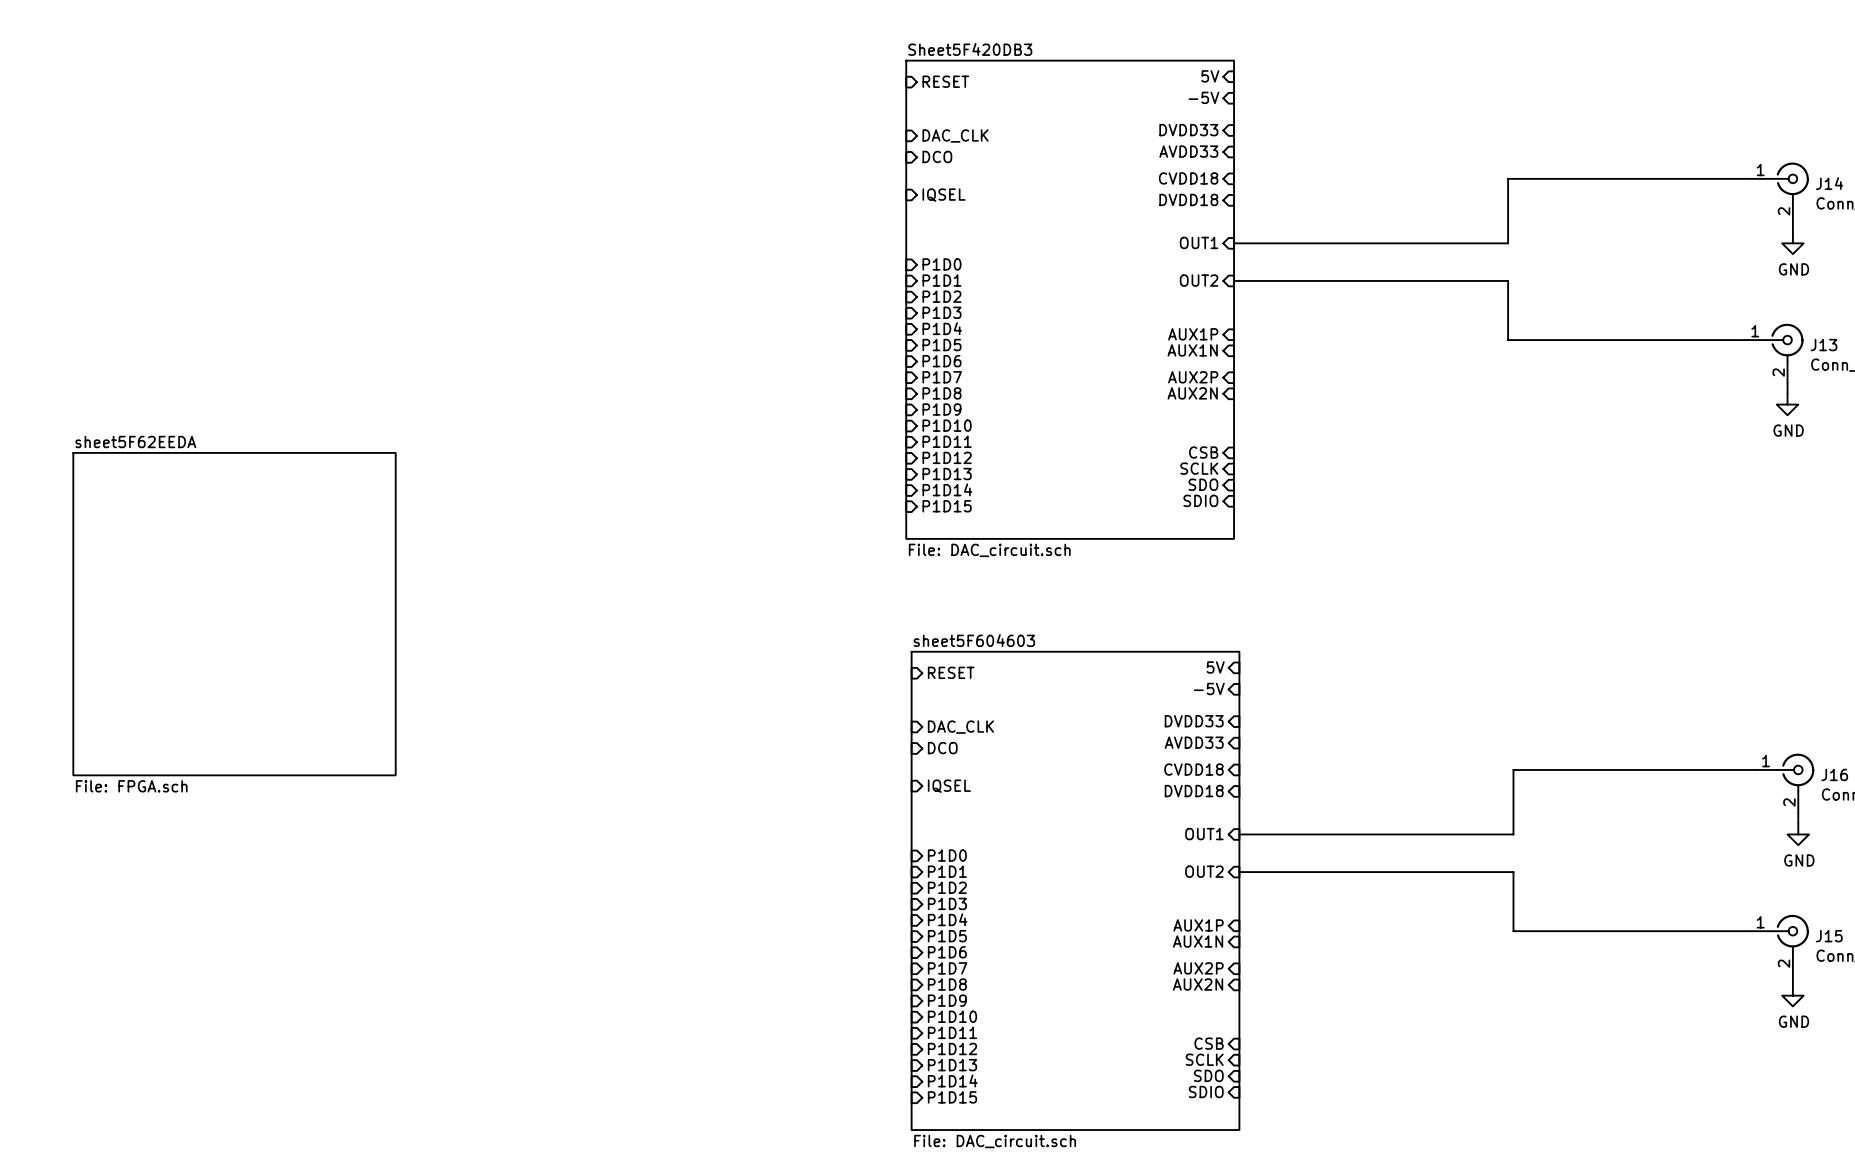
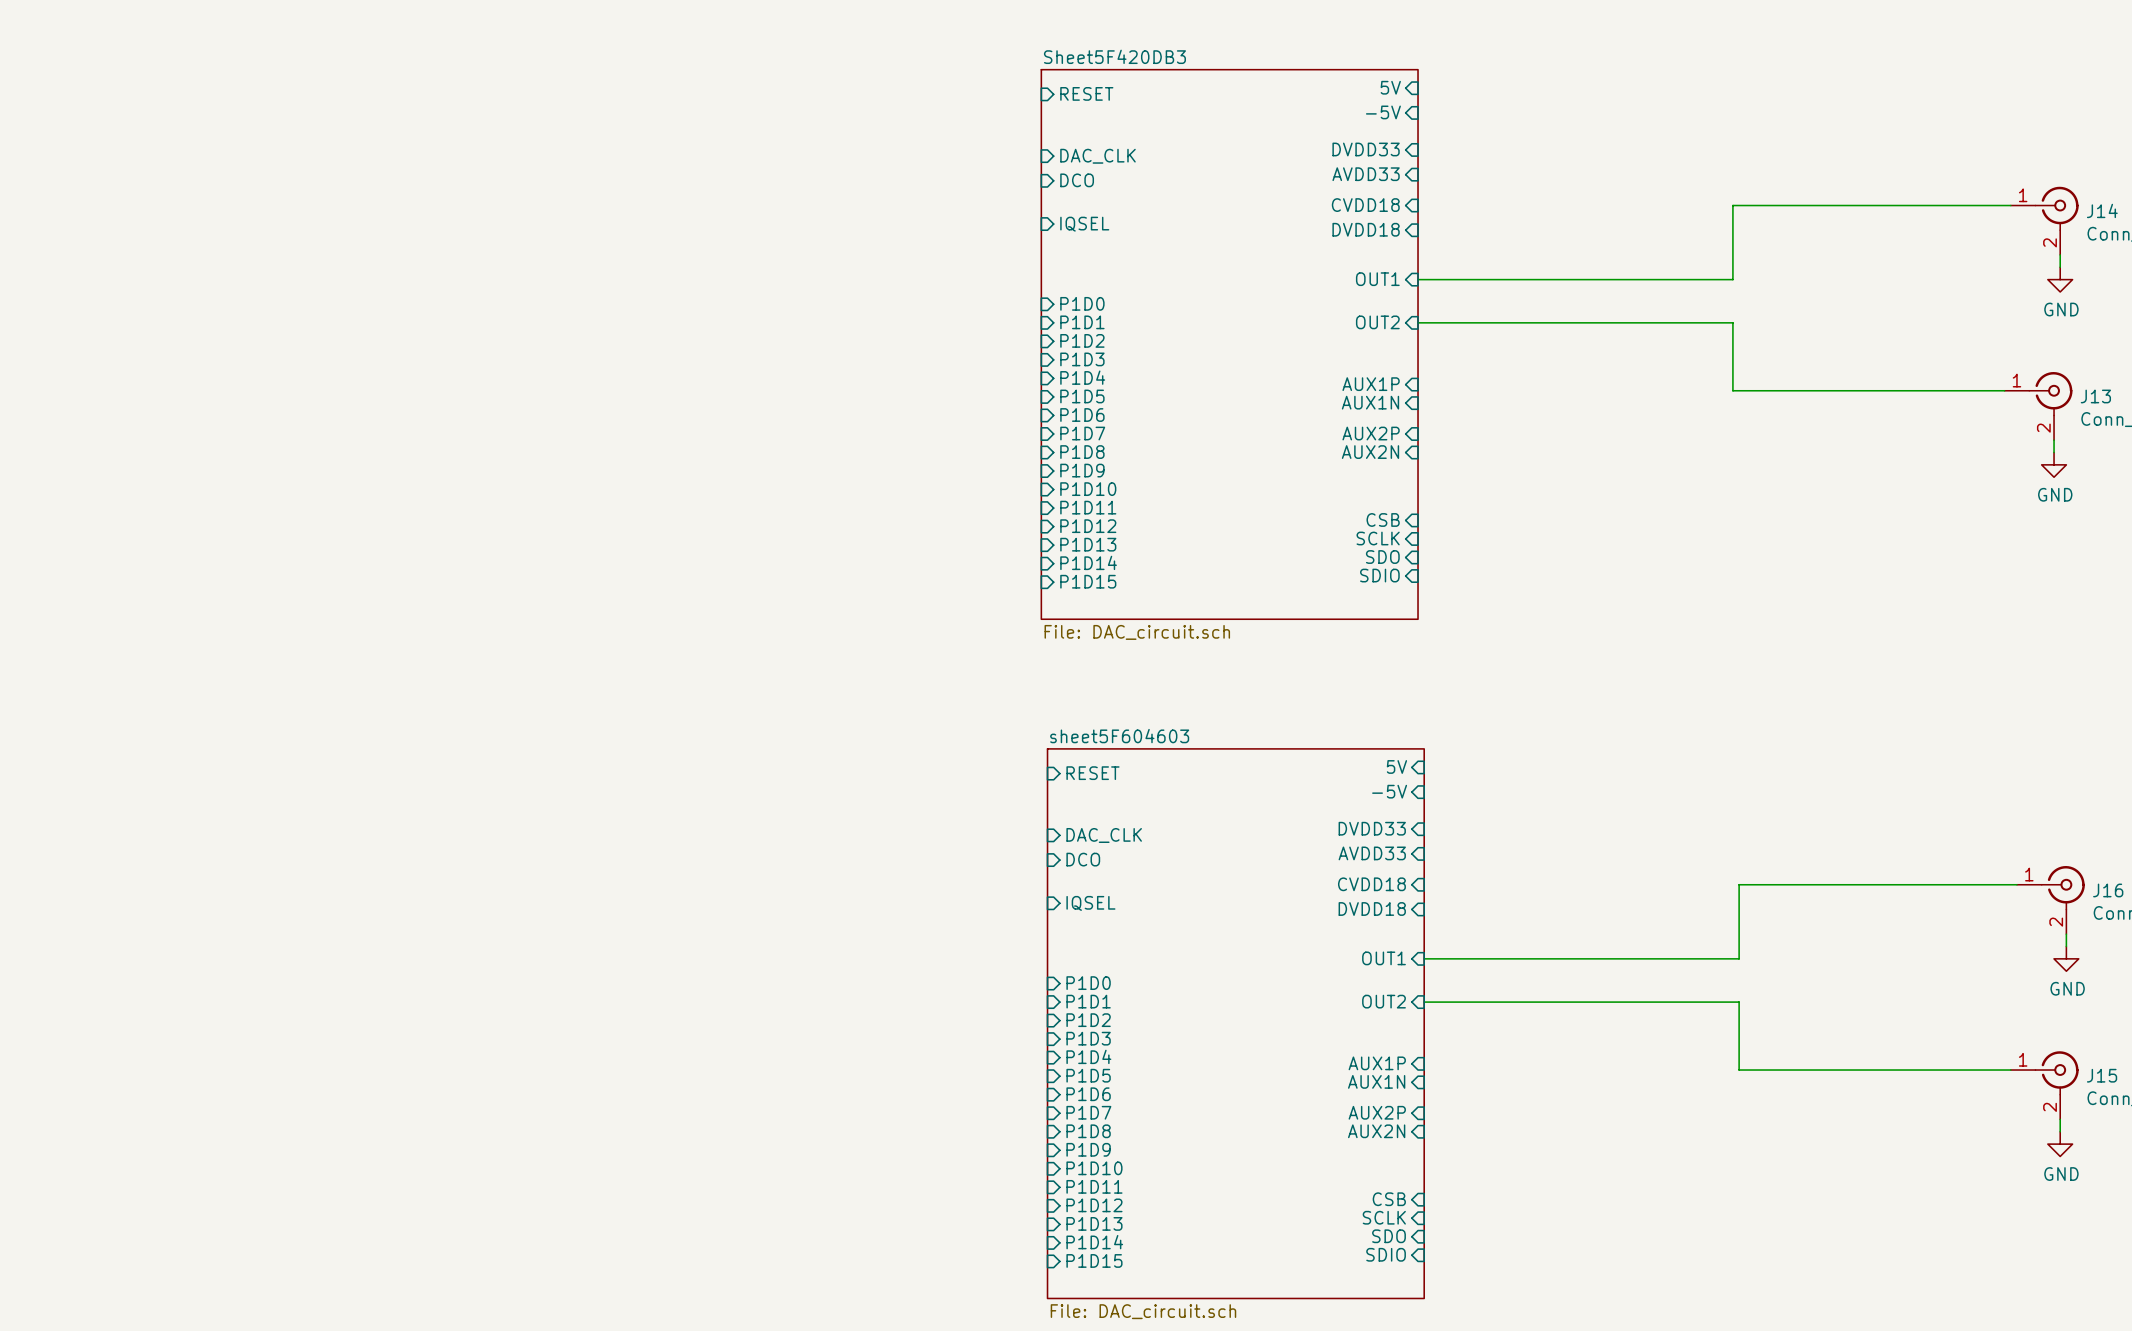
sheet sheet5F62EEDA: File: FPGA.sch (234, 614) -> none

